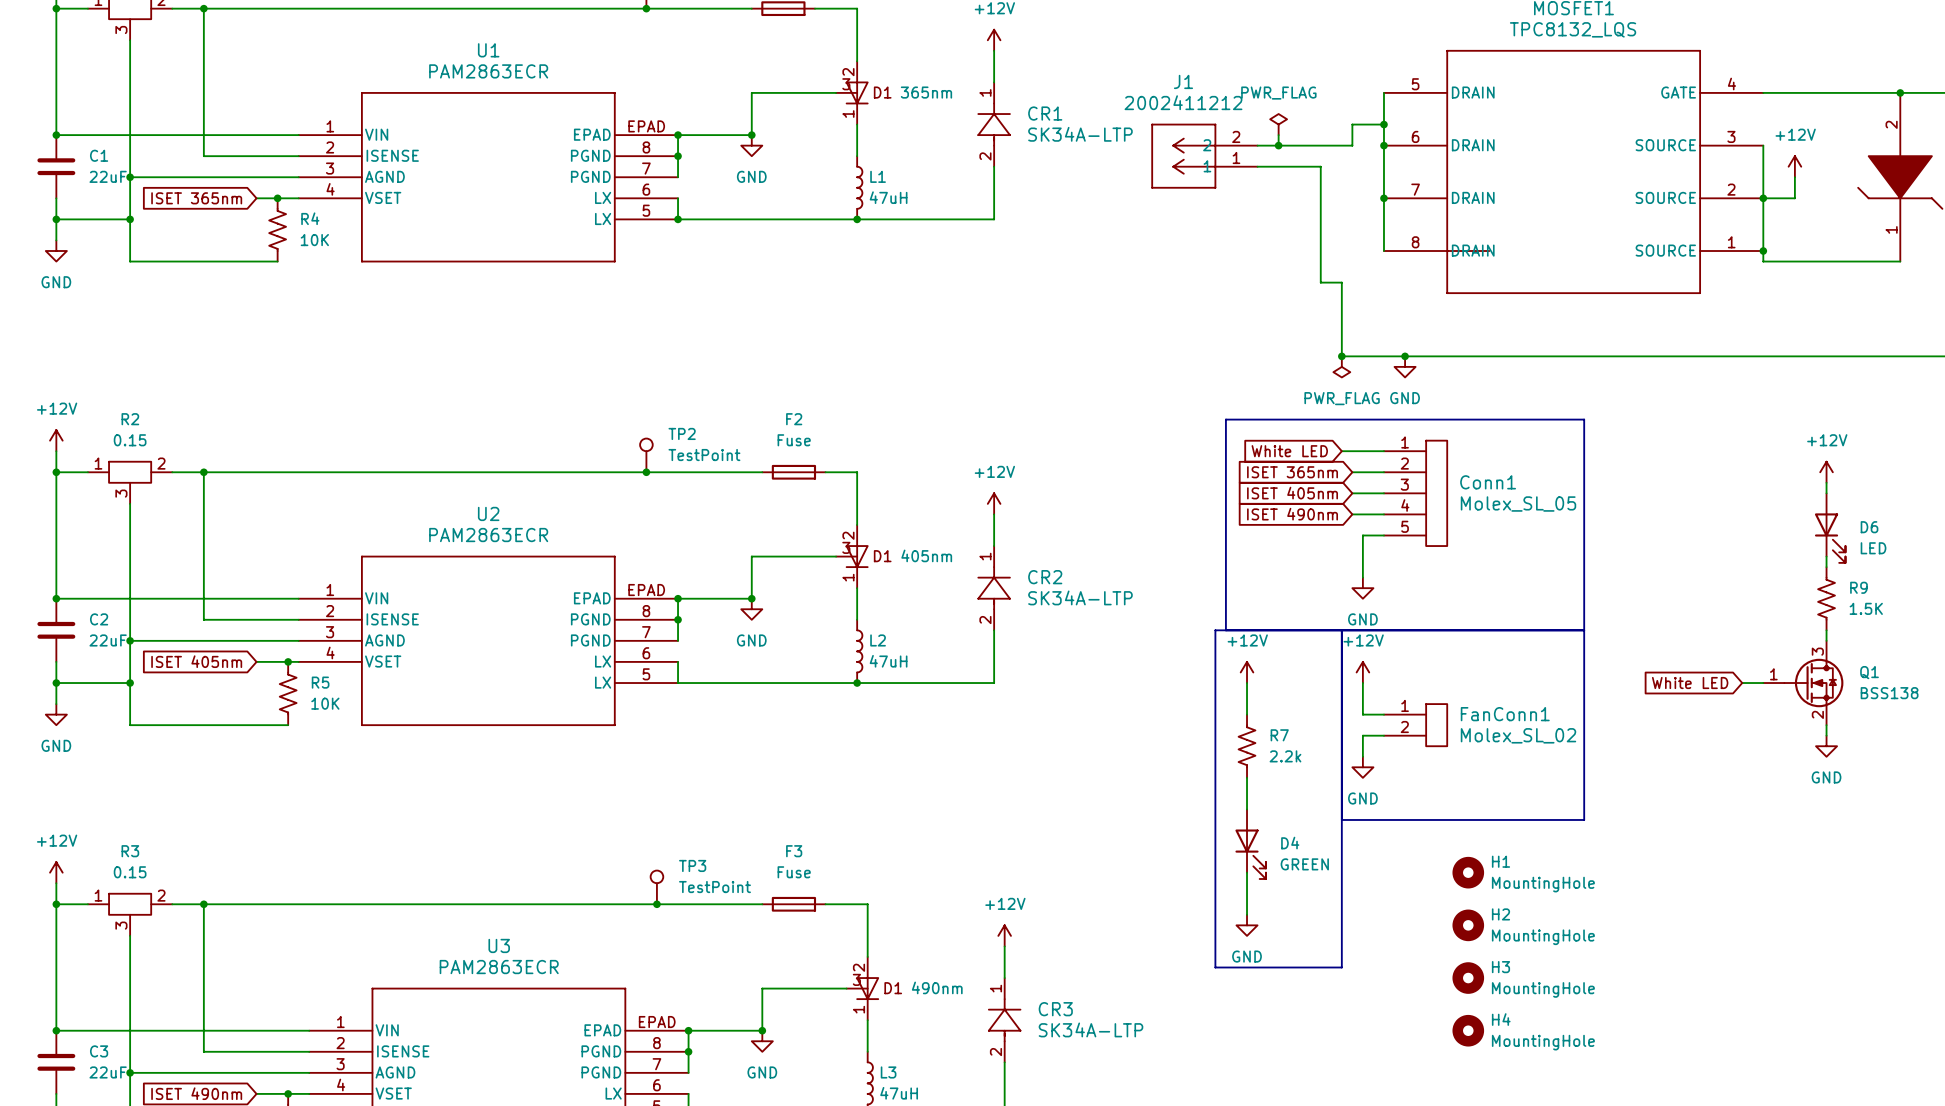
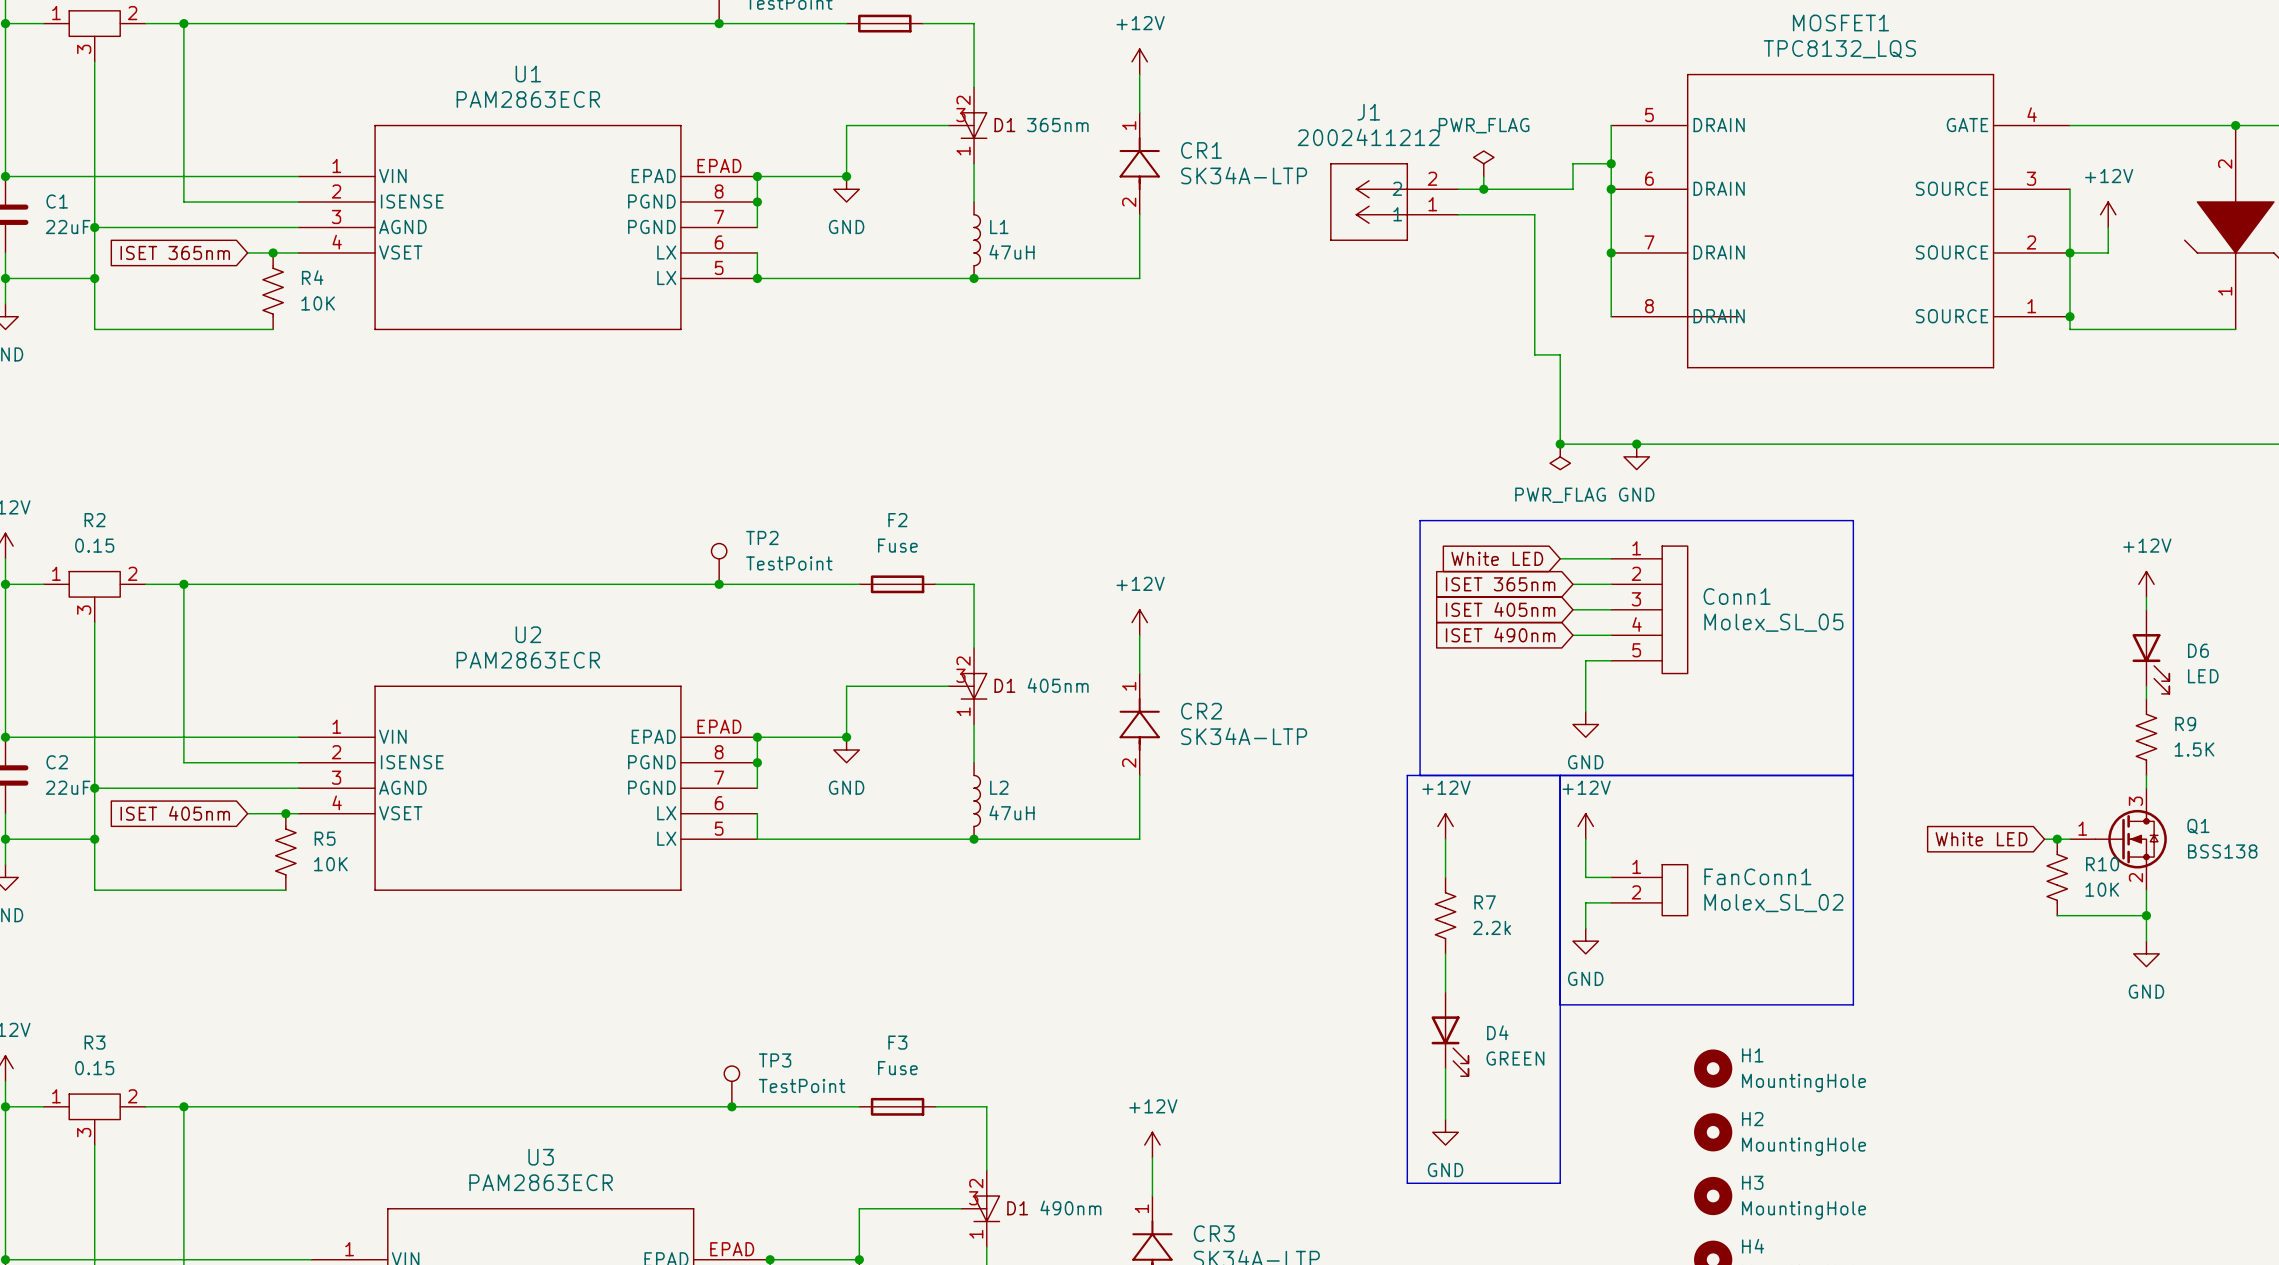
junction: none -> (2057, 839)
R10: none -> 10K (2057, 877)
wire: none -> (2146, 902) (2146, 941)
wire: none -> (2057, 915) (2146, 915)
power symbol position: GND (1826, 746) -> GND (2146, 953)
junction: none -> (2146, 915)

